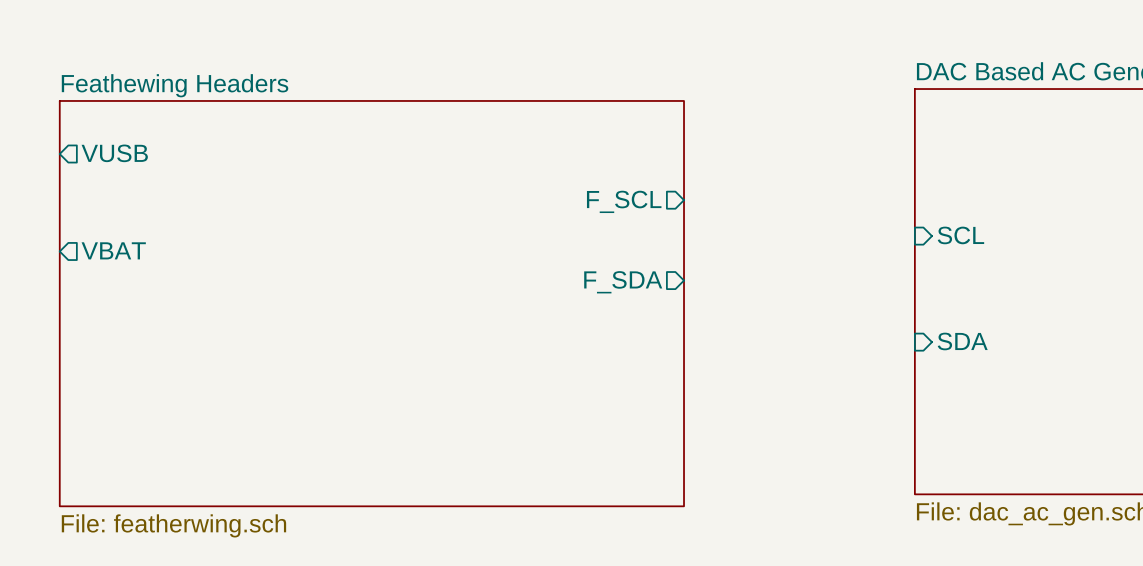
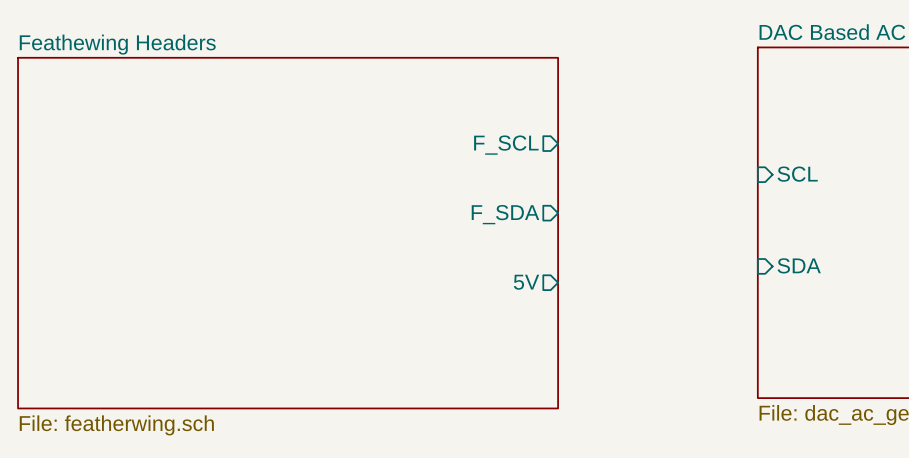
sheet pin: VUSB (114, 153) -> none
sheet pin: VBAT (113, 250) -> none
sheet pin: none -> 5V (526, 282)

